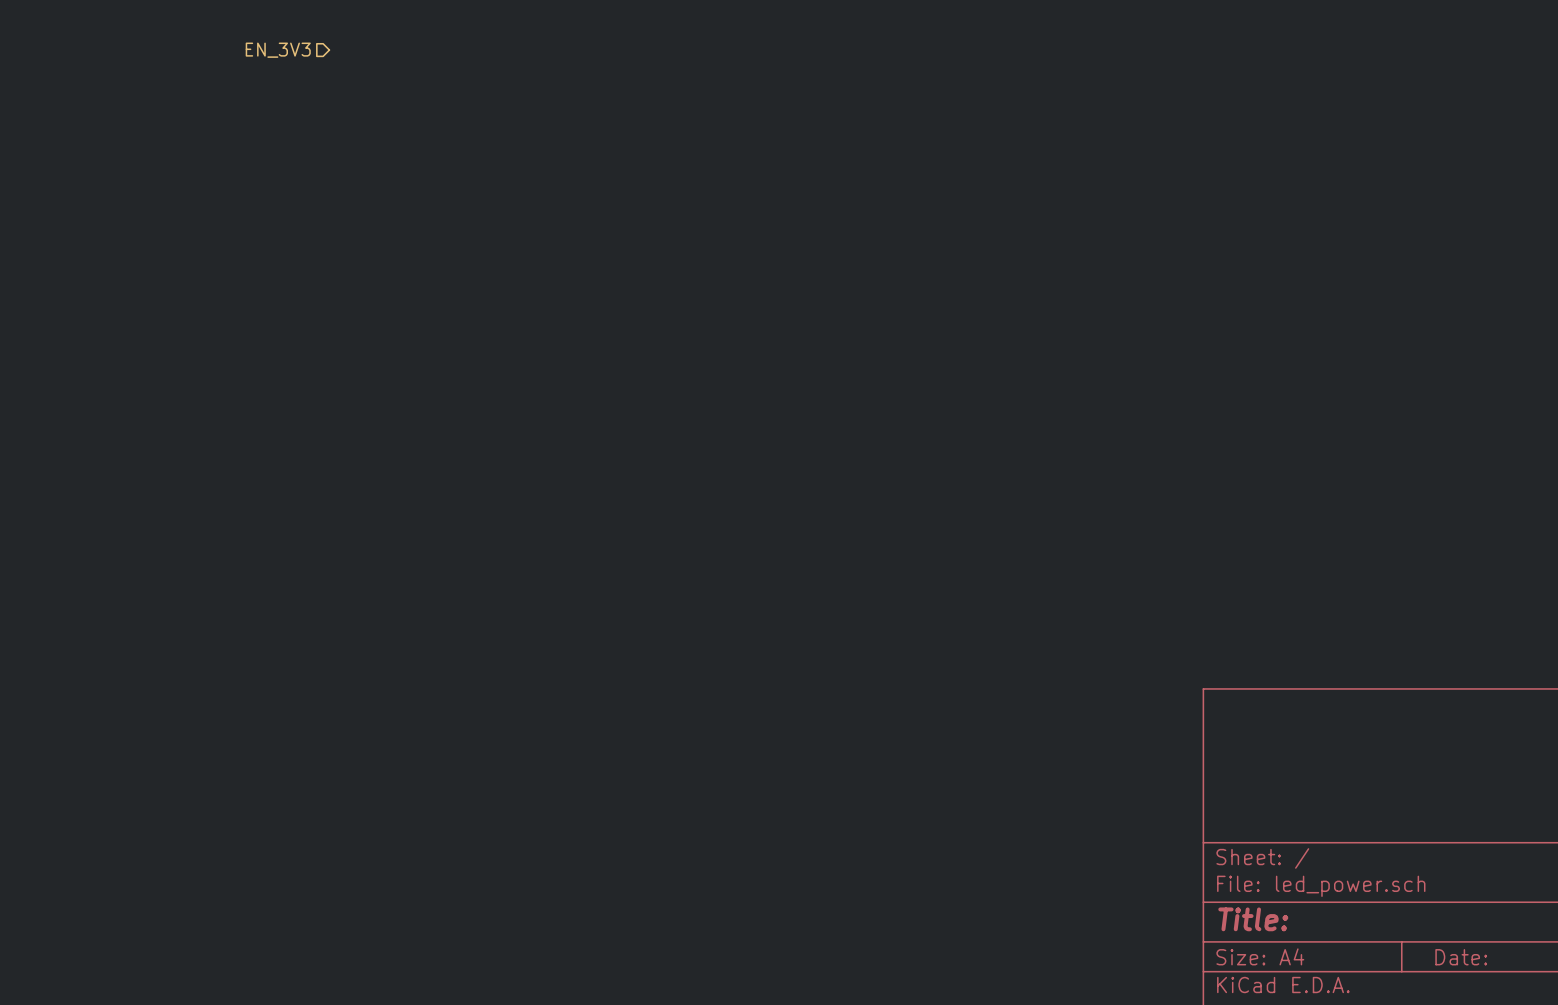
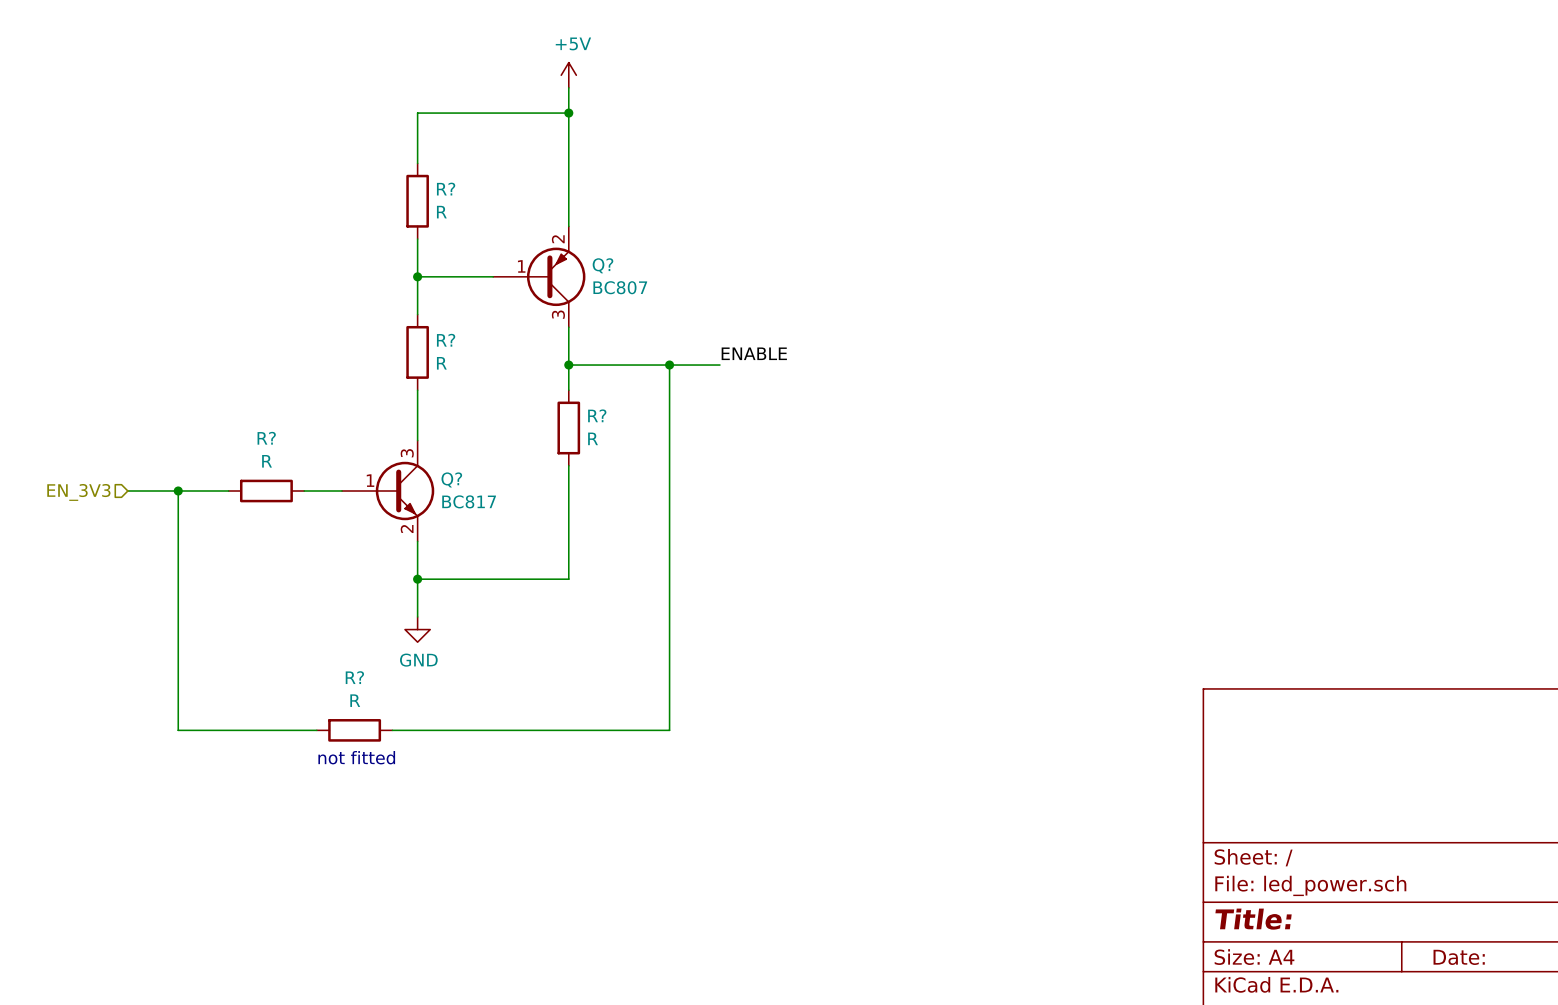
hierarchical label: EN_3V3 (278, 50) -> none
power symbol: none -> +5V (568, 75)
wire: none -> (568, 87) (568, 226)
wire: none -> (568, 113) (417, 113) (417, 163)
junction: none -> (568, 113)
R?: none -> R (417, 201)
wire: none -> (417, 239) (417, 314)
wire: none -> (417, 276) (493, 276)
junction: none -> (417, 276)
Q?: none -> BC807 (539, 276)
wire: none -> (568, 327) (568, 390)
R?: none -> R (417, 352)
label: none -> ENABLE (754, 353)
wire: none -> (568, 365) (719, 365)
junction: none -> (568, 365)
wire: none -> (669, 365) (669, 730) (392, 730)
junction: none -> (669, 365)
wire: none -> (417, 390) (417, 440)
R?: none -> R (568, 428)
wire: none -> (568, 465) (568, 579) (417, 579)
hierarchical label: none -> EN_3V3 (78, 492)
wire: none -> (127, 491) (228, 491)
wire: none -> (178, 491) (178, 730) (316, 730)
junction: none -> (178, 491)
R?: none -> R (266, 491)
wire: none -> (304, 491) (342, 491)
Q?: none -> BC817 (388, 491)
wire: none -> (417, 541) (417, 616)
junction: none -> (417, 579)
power symbol: none -> GND (417, 629)
R?: none -> R (354, 730)
text: none -> not fitted (356, 757)

